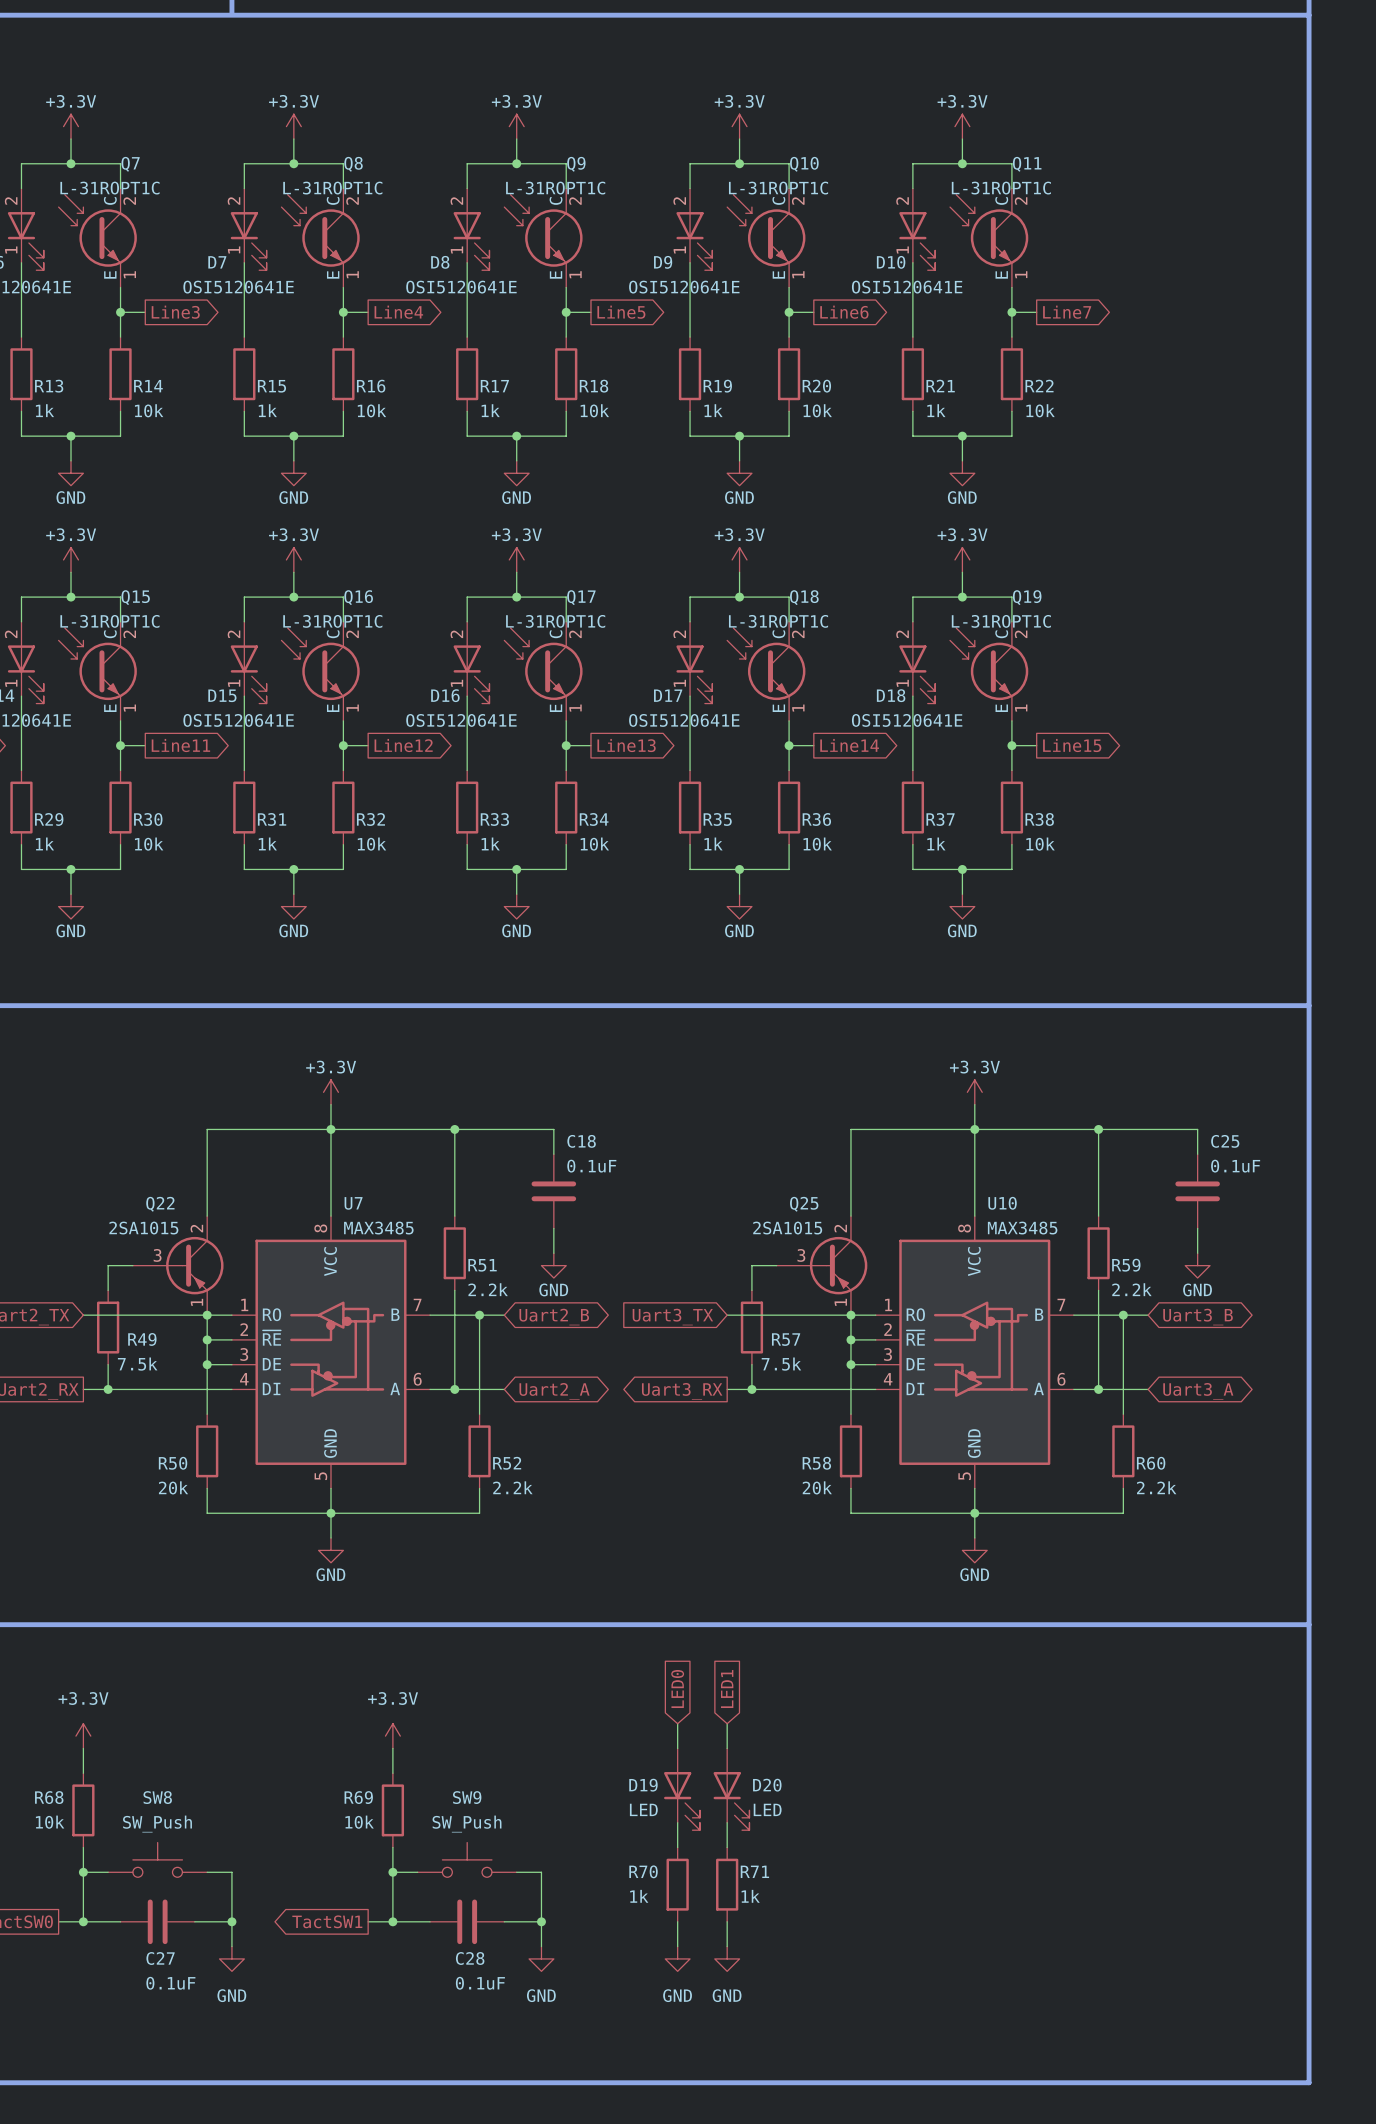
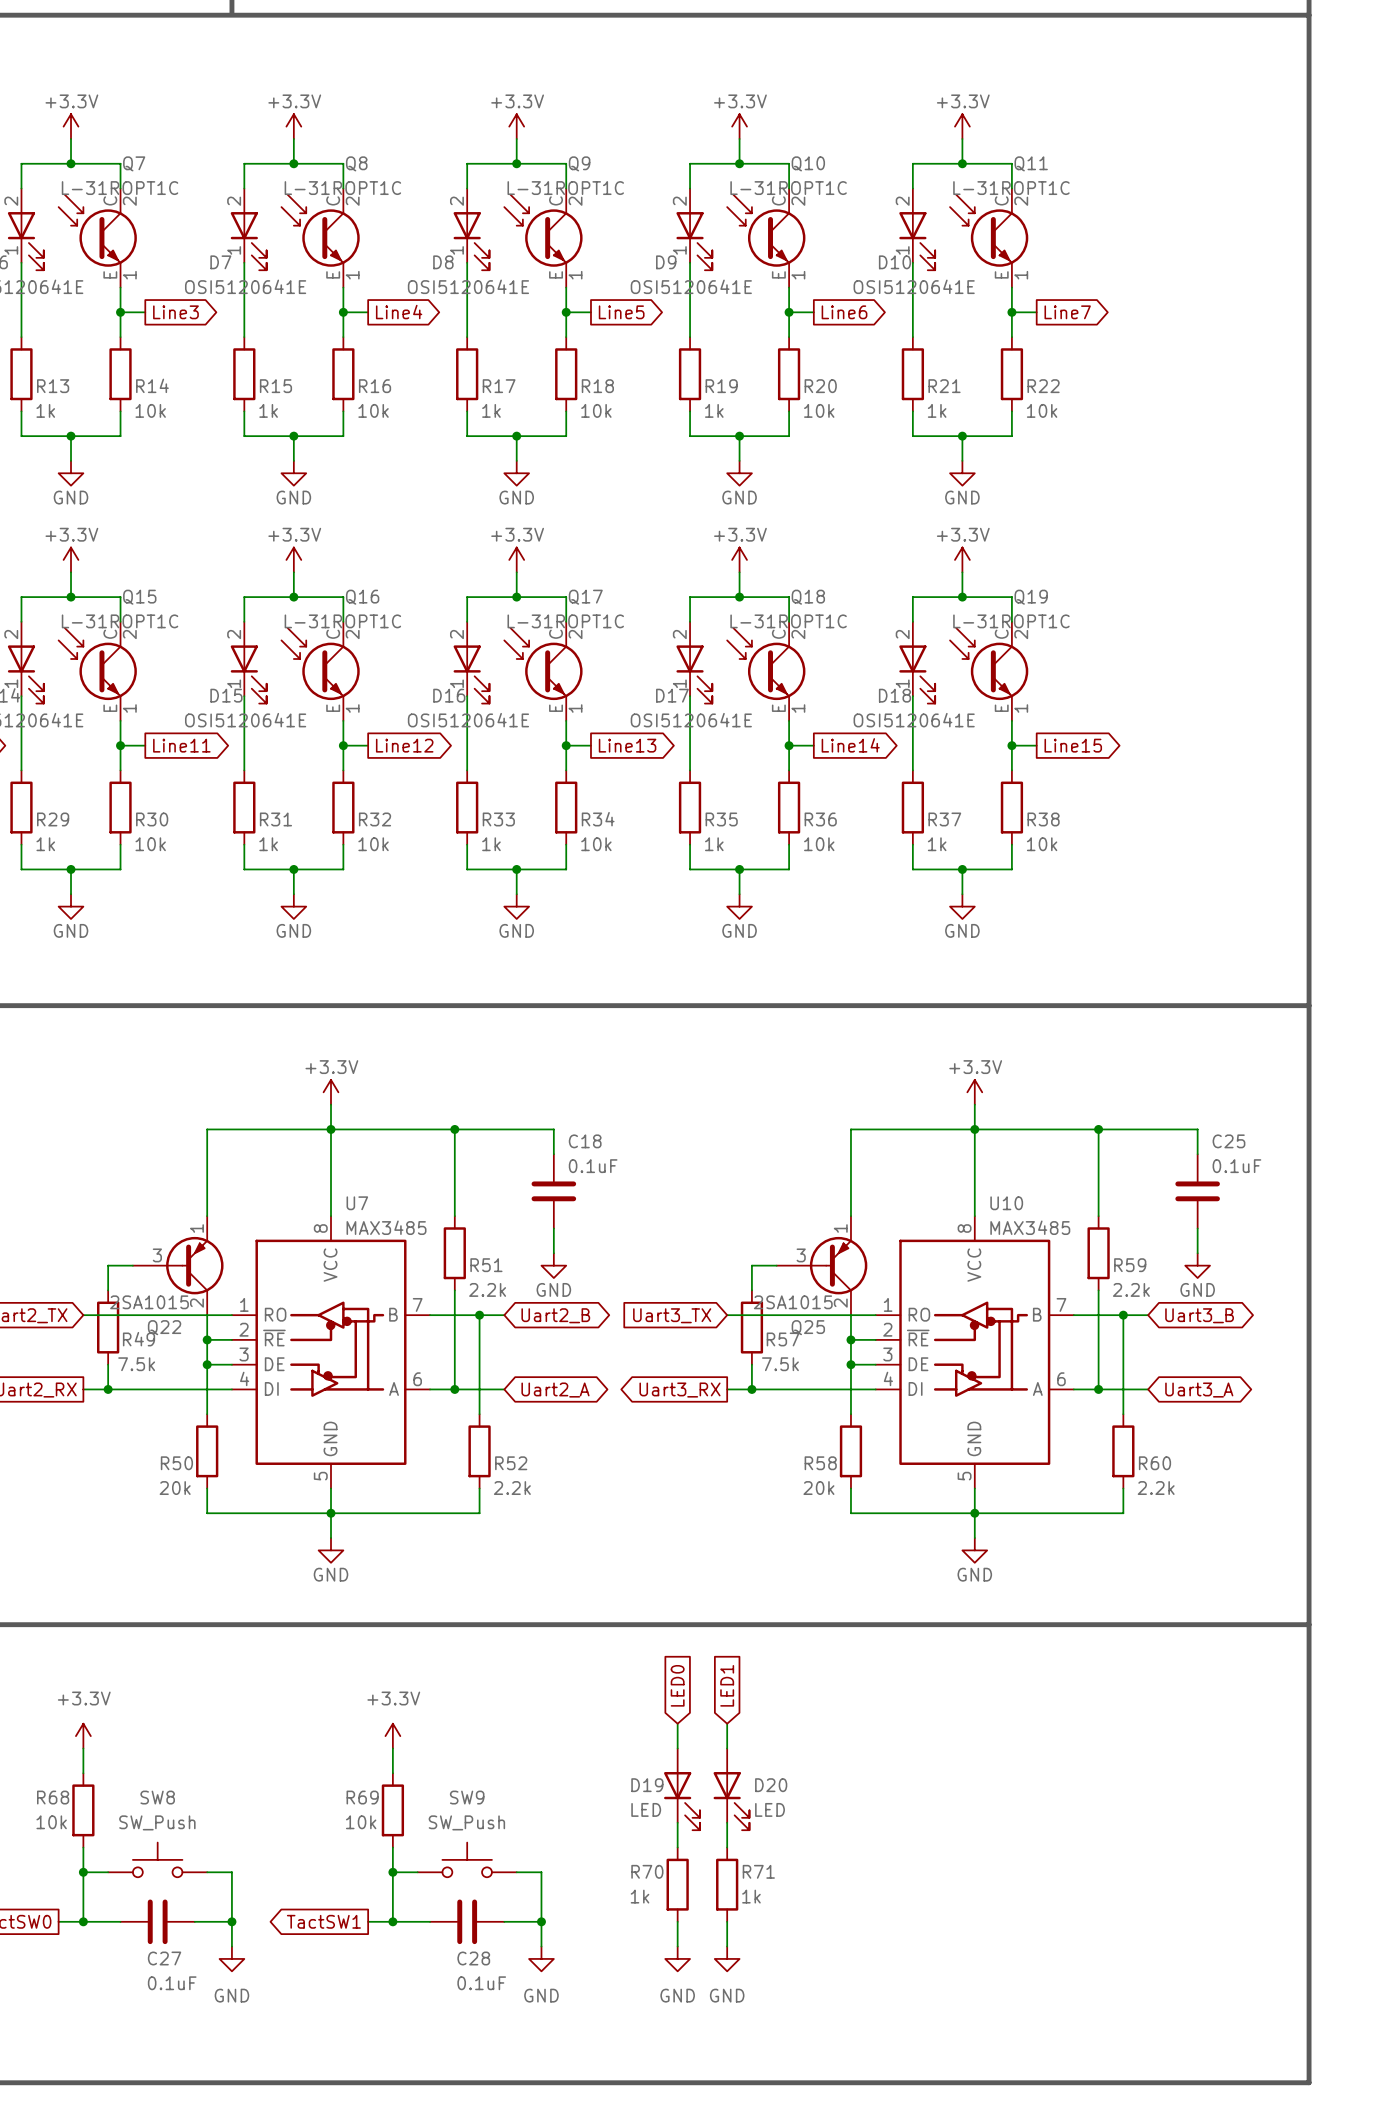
Q22 flip: as is (194, 1265) -> up-down (194, 1265)
Q25 flip: as is (838, 1265) -> up-down (838, 1265)
junction: (207, 1315) -> none
junction: (850, 1315) -> none

